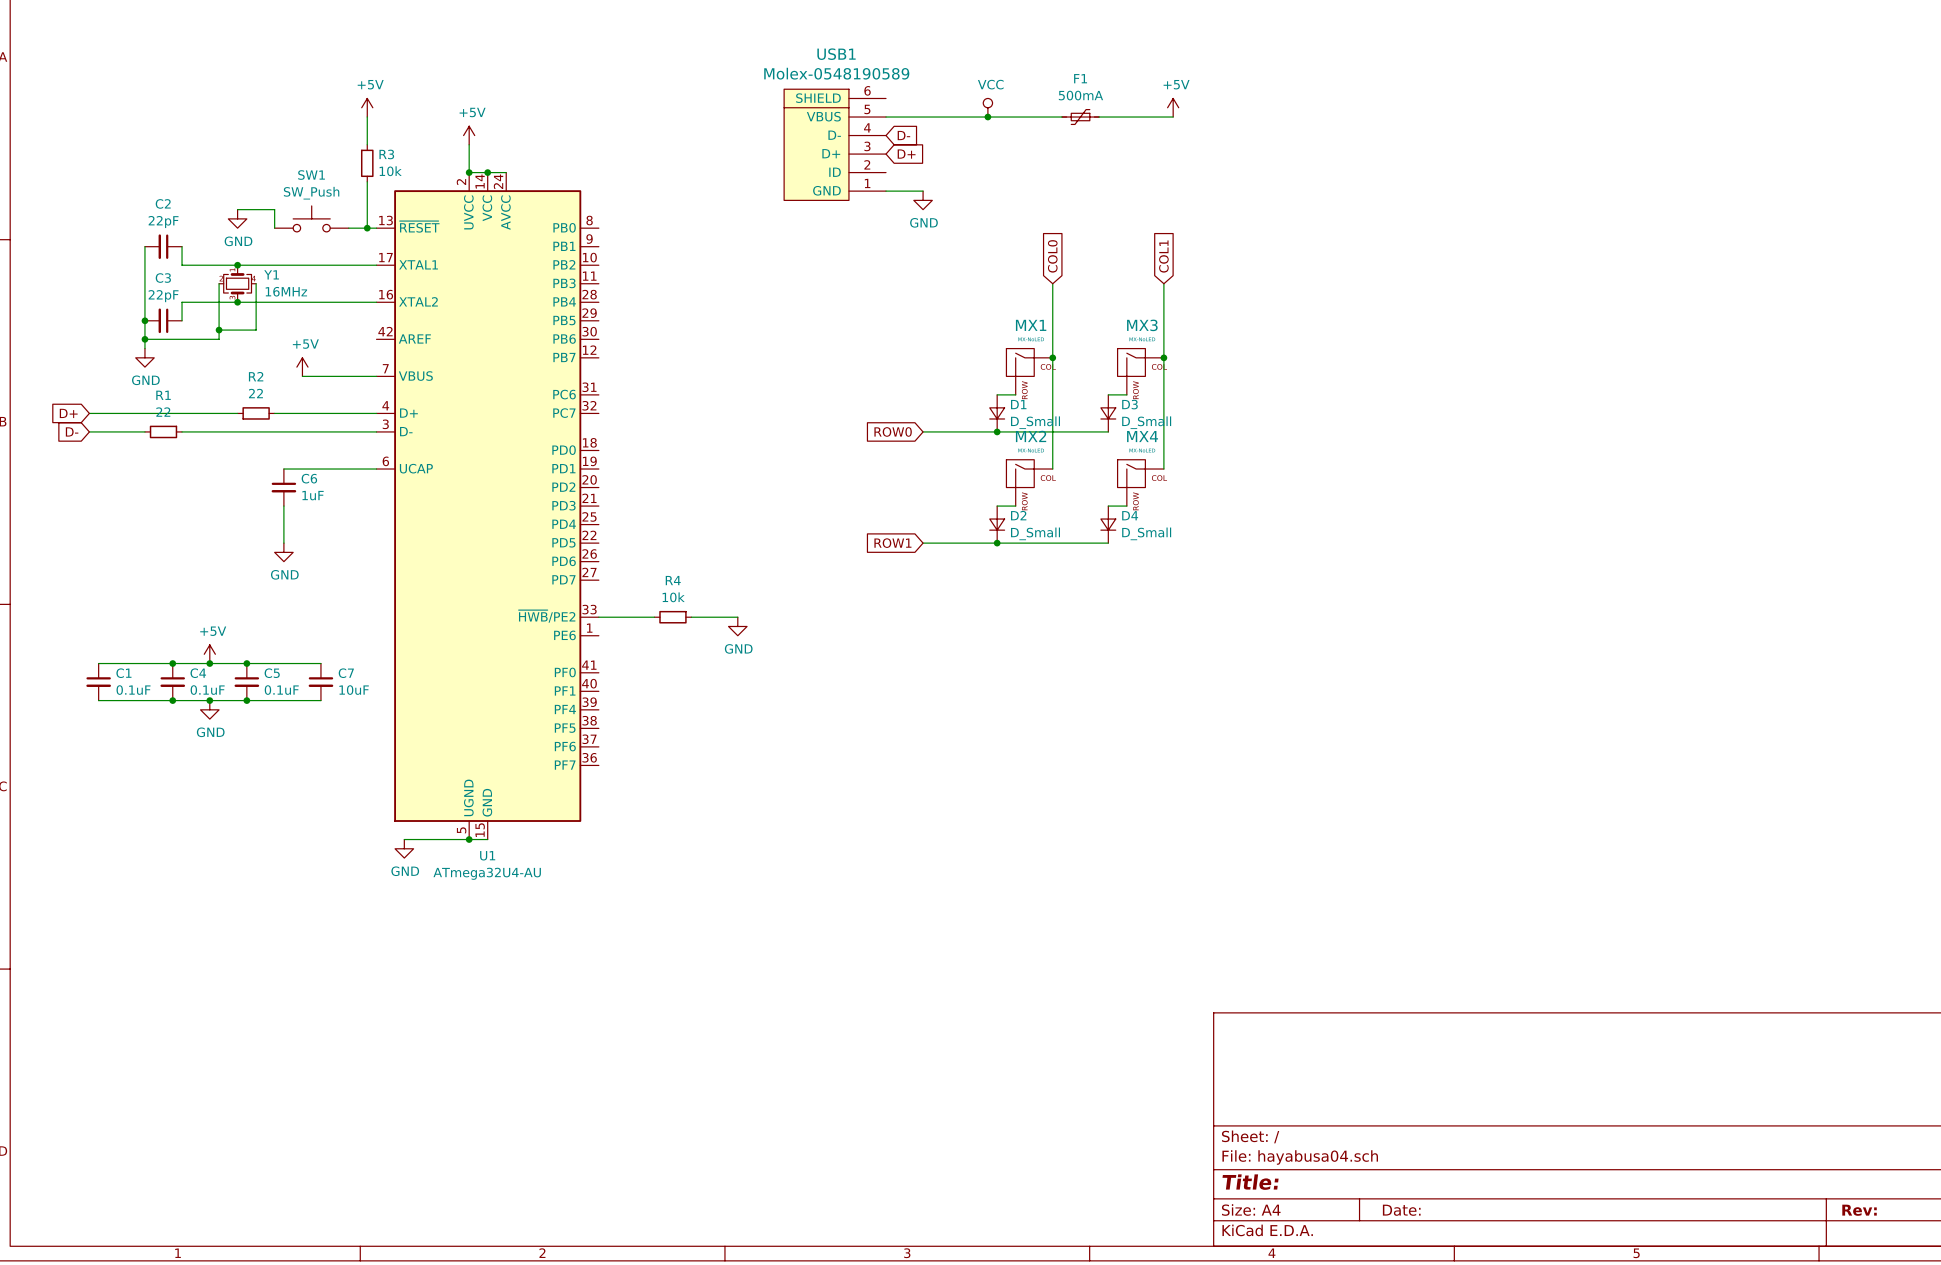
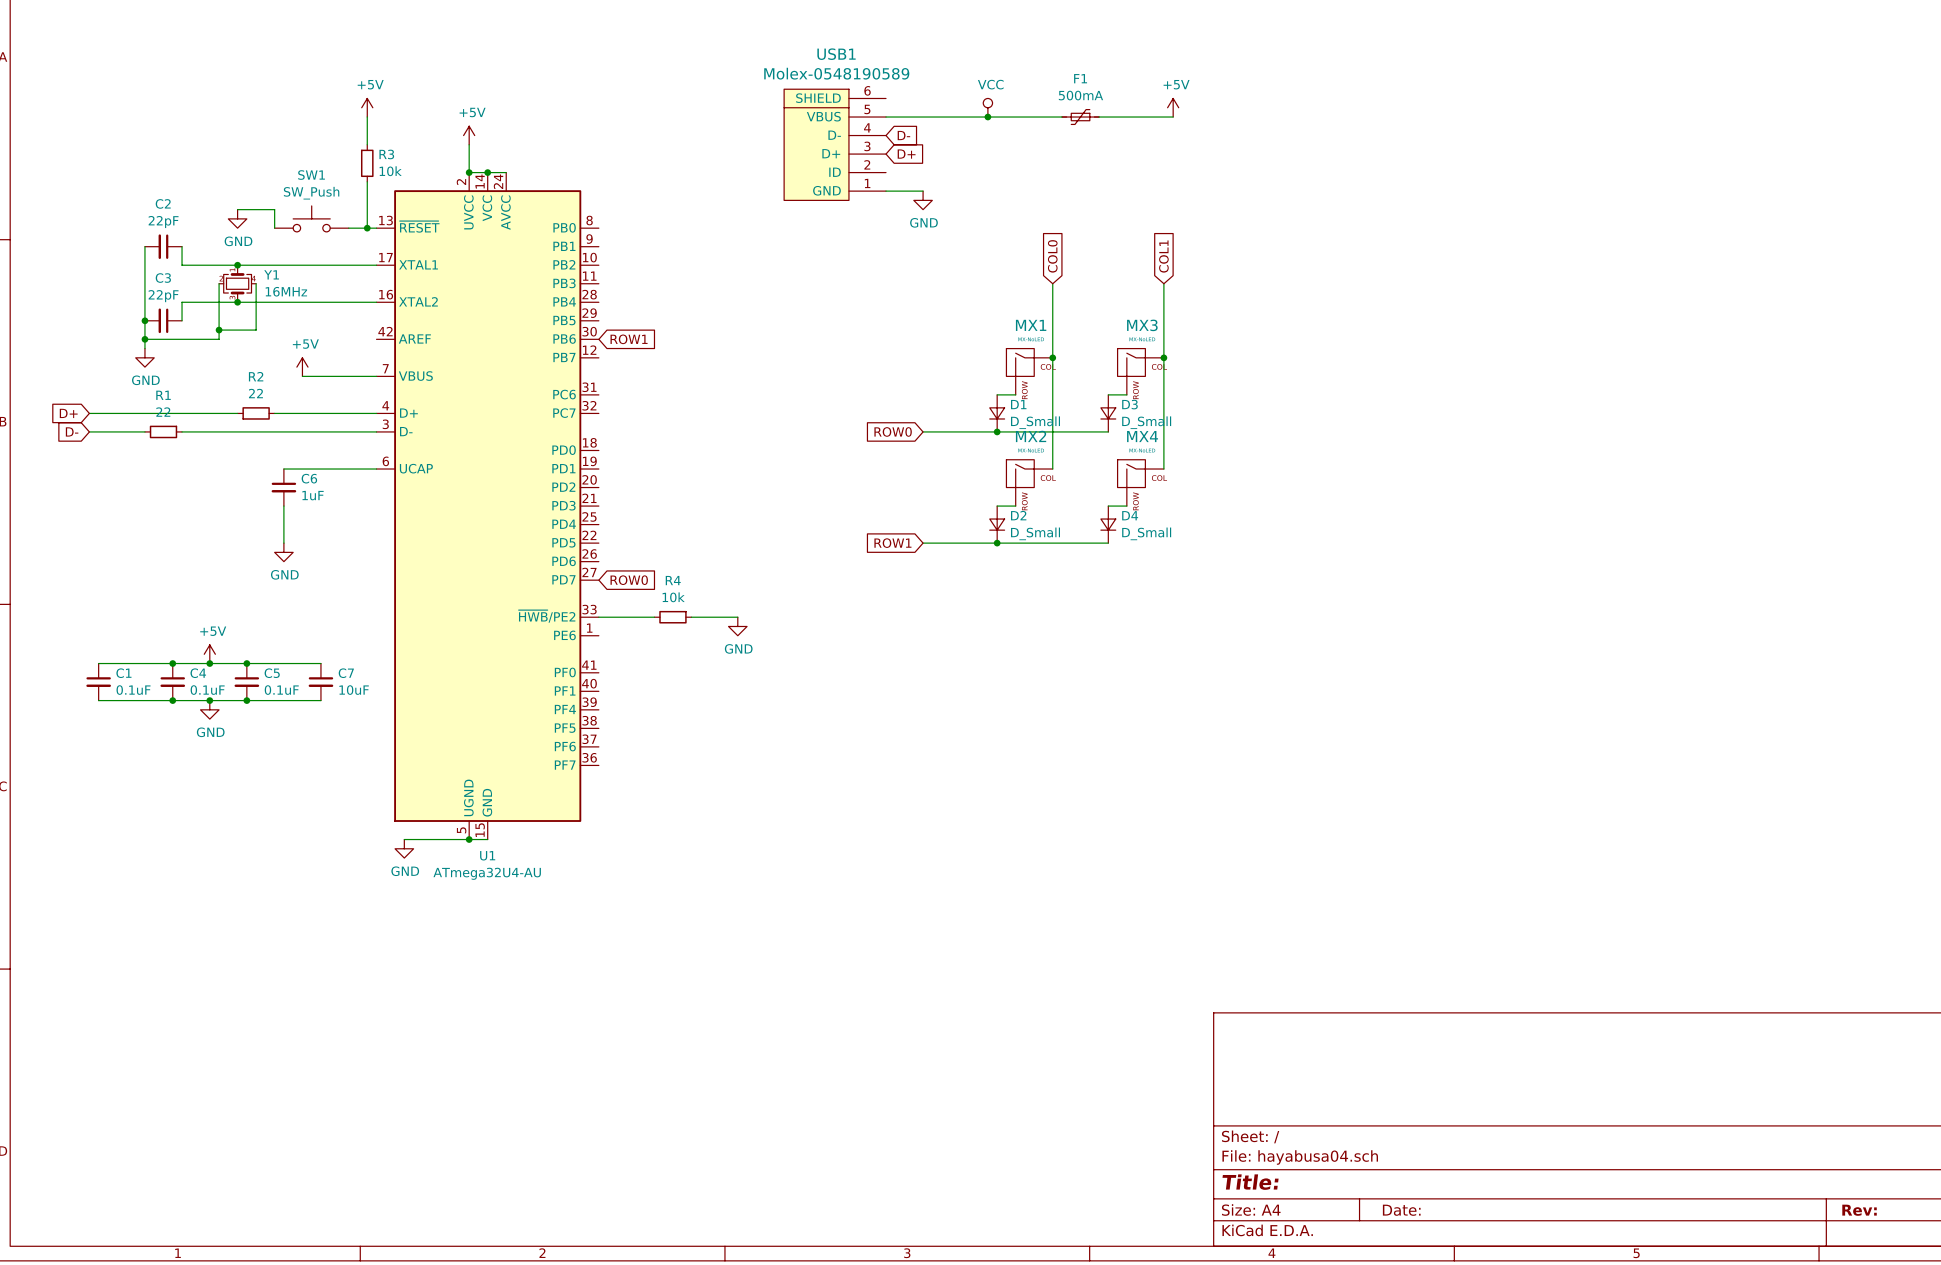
global label: none -> ROW1 (629, 339)
global label: none -> ROW0 (629, 580)

